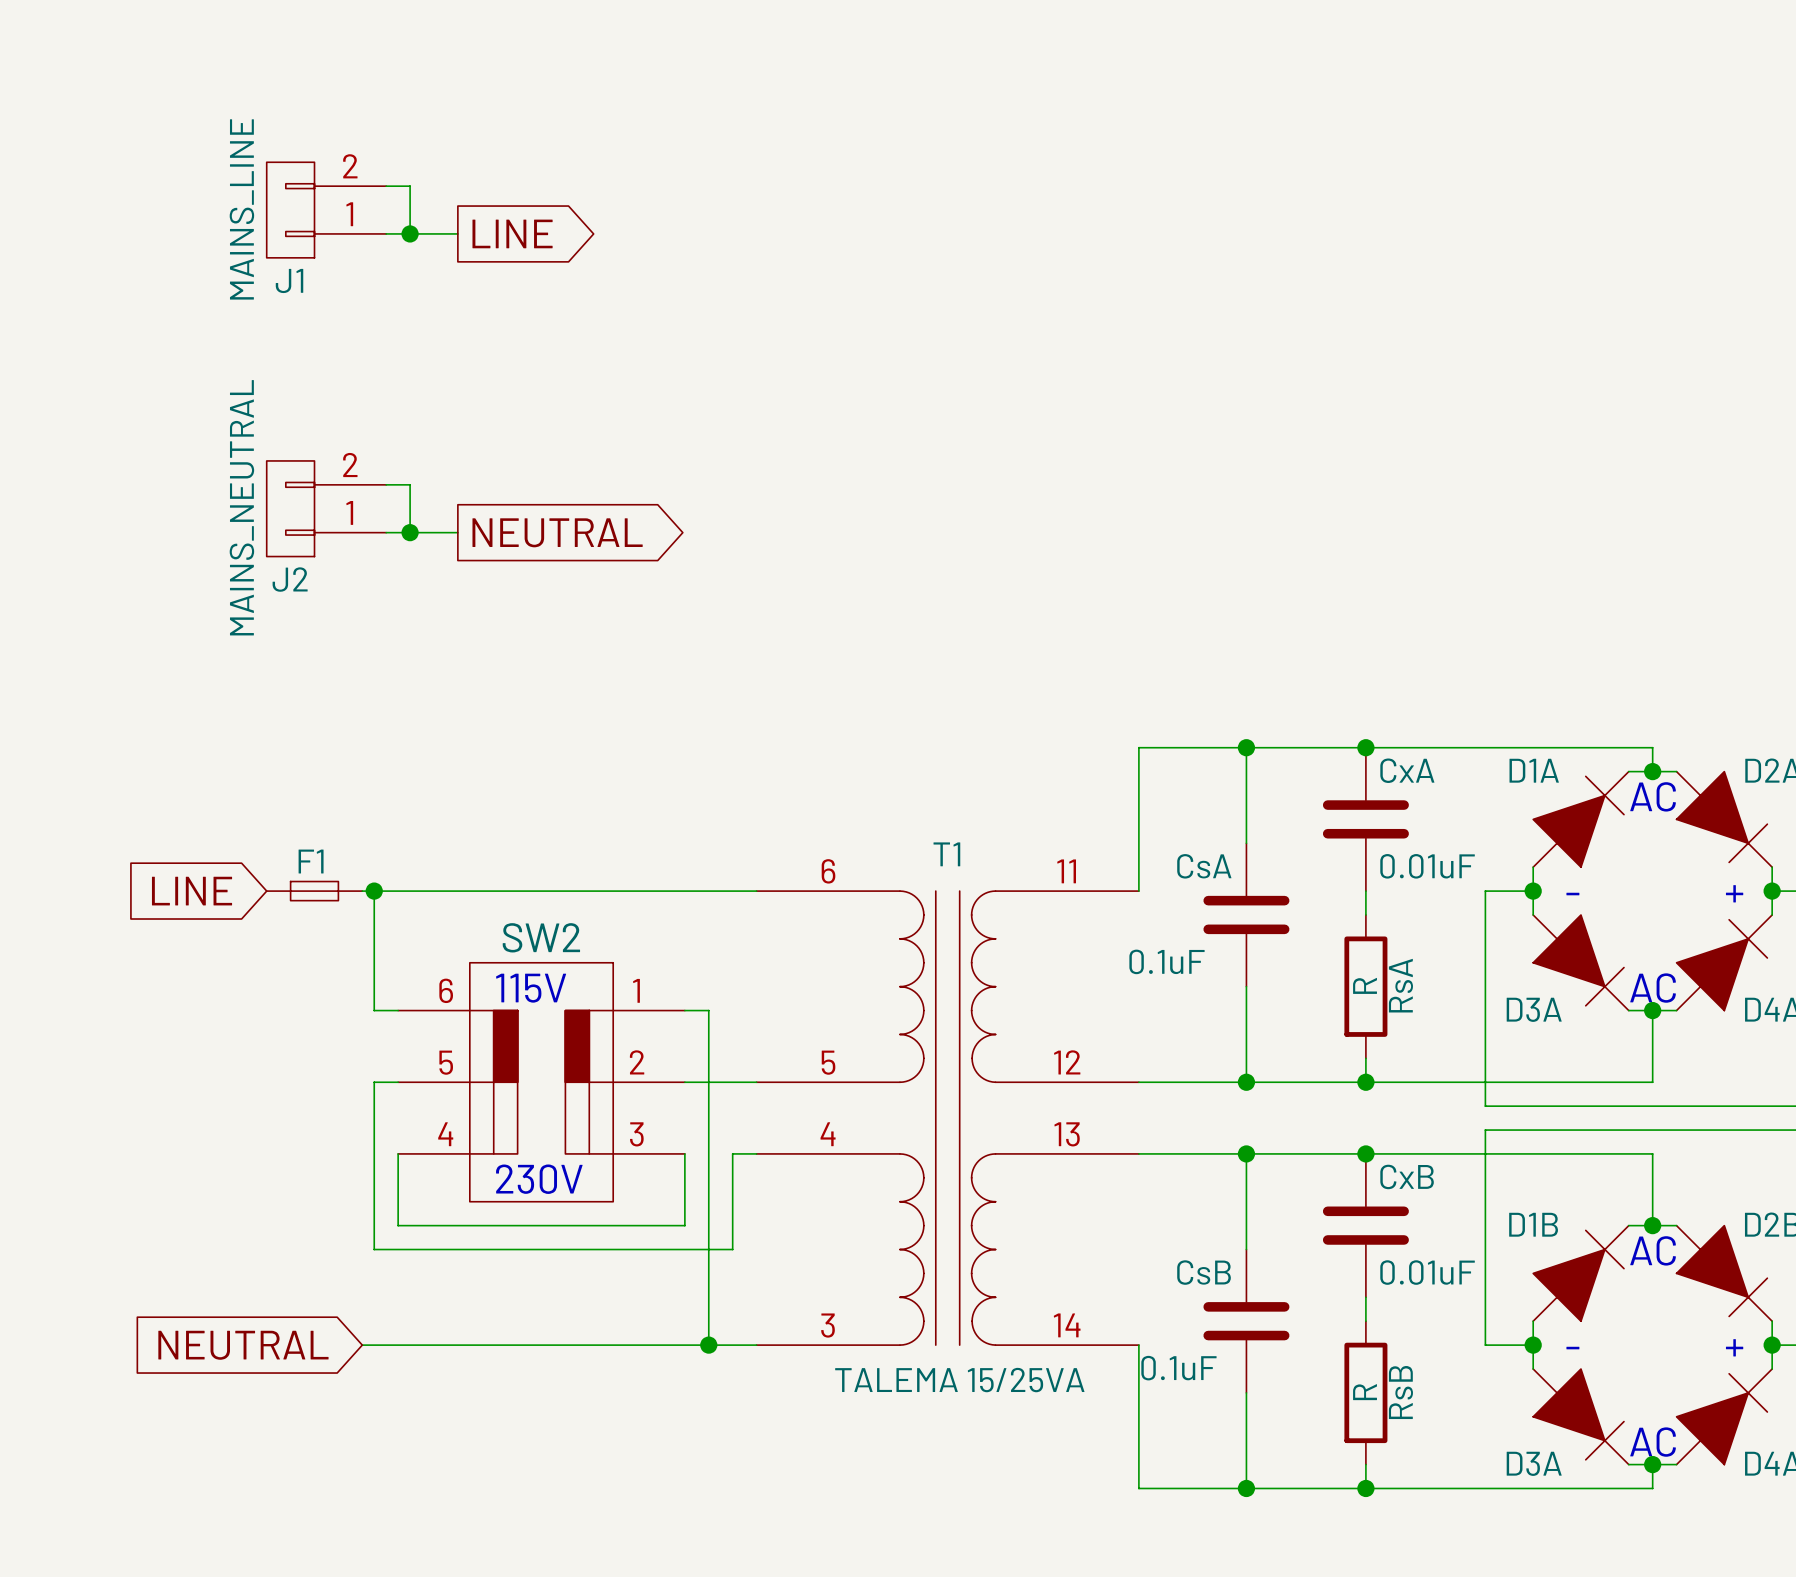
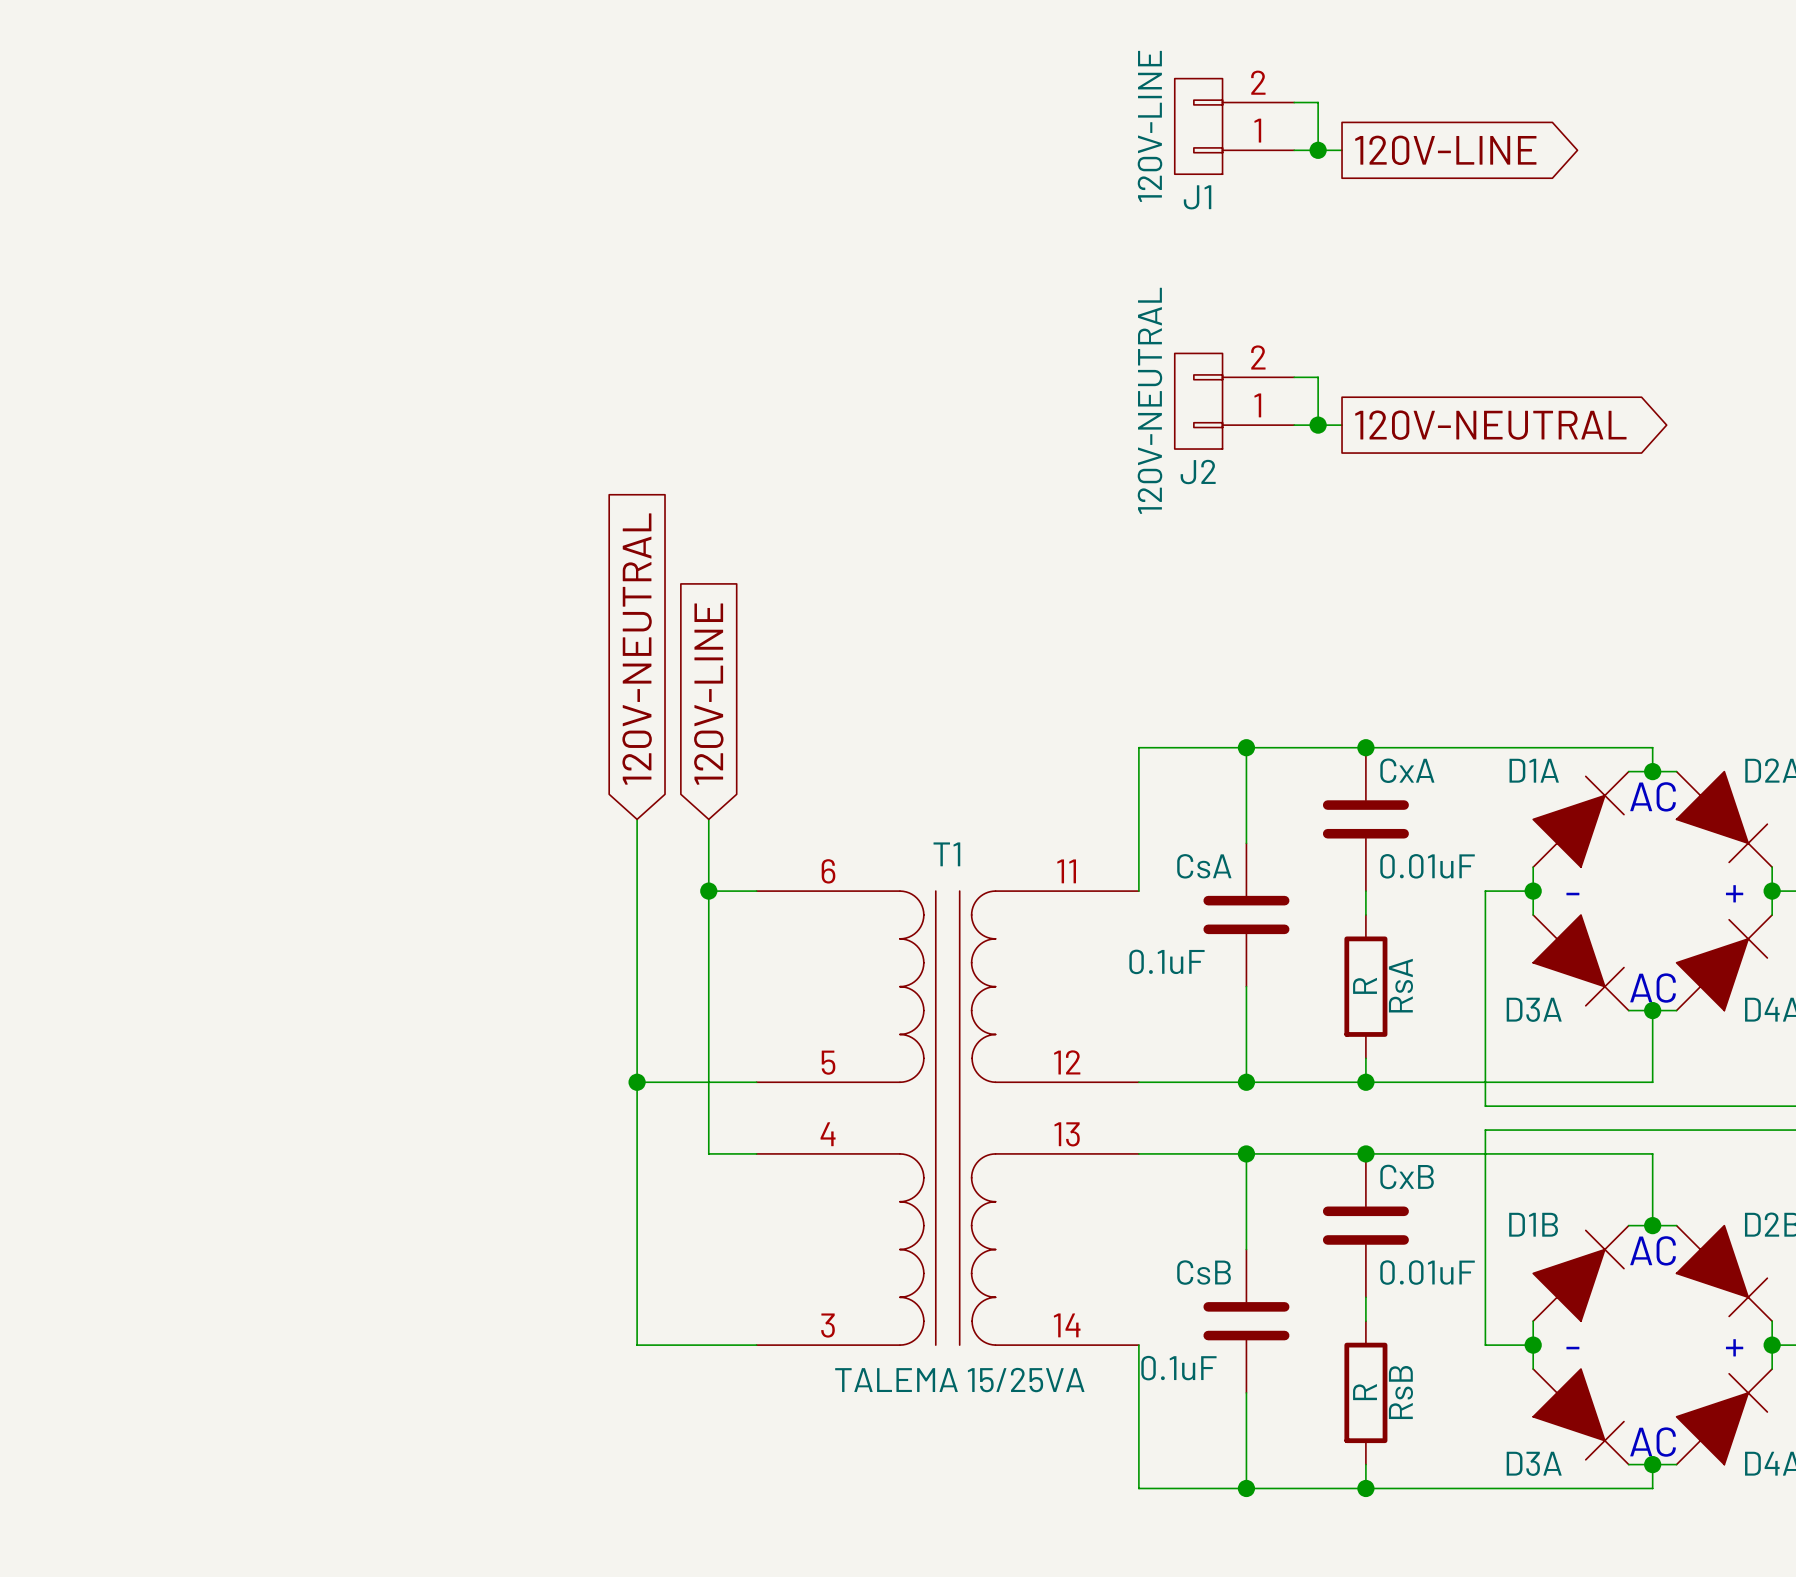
wire: none -> (1294, 102) (1318, 102) (1318, 150)
wire: none -> (1294, 150) (1342, 150)
junction: none -> (1318, 150)
global label: none -> 120V-LINE (1445, 150)
wire: (386, 186) (410, 186) (410, 233) -> none
J1 value: MAINS_LINE (241, 209) -> 120V-LINE (1149, 126)
J1 position: (326, 210) -> (1234, 126)
wire: (386, 233) (457, 233) -> none
junction: (410, 233) -> none
global label: LINE (512, 233) -> none
wire: none -> (1294, 377) (1318, 377) (1318, 425)
wire: none -> (1294, 425) (1342, 425)
junction: none -> (1318, 425)
global label: none -> 120V-NEUTRAL (1490, 425)
wire: (386, 484) (410, 484) (410, 532) -> none
J2 value: MAINS_NEUTRAL (241, 507) -> 120V-NEUTRAL (1149, 400)
J2 position: (326, 508) -> (1234, 401)
wire: (386, 532) (457, 532) -> none
junction: (410, 532) -> none
global label shape: output (557, 532) -> input (637, 649)
global label: NEUTRAL (557, 532) -> 120V-NEUTRAL (637, 649)
global label: none -> 120V-LINE (708, 694)
global label: LINE (192, 891) -> none
F1: (314, 891) -> none
wire: (362, 891) (708, 891) -> none
wire: (374, 891) (374, 1010) (398, 1010) -> none
junction: (374, 891) -> none
junction: none -> (708, 891)
text: 115V (531, 988) -> none
wire: (684, 1010) (708, 1010) -> (708, 819) (708, 1010)
wire: (398, 1082) (374, 1082) (374, 1249) (732, 1249) (732, 1153) -> none
SW2: (541, 1082) -> none
junction: none -> (637, 1082)
wire: (398, 1153) (398, 1225) (684, 1225) (684, 1153) -> none
wire: (708, 1153) (708, 1345) -> (708, 1153) (732, 1153)
text: 230V (539, 1179) -> none
global label: NEUTRAL (243, 1345) -> none
wire: (362, 1345) (637, 1345) -> (637, 819) (637, 1345)
junction: (708, 1345) -> none

